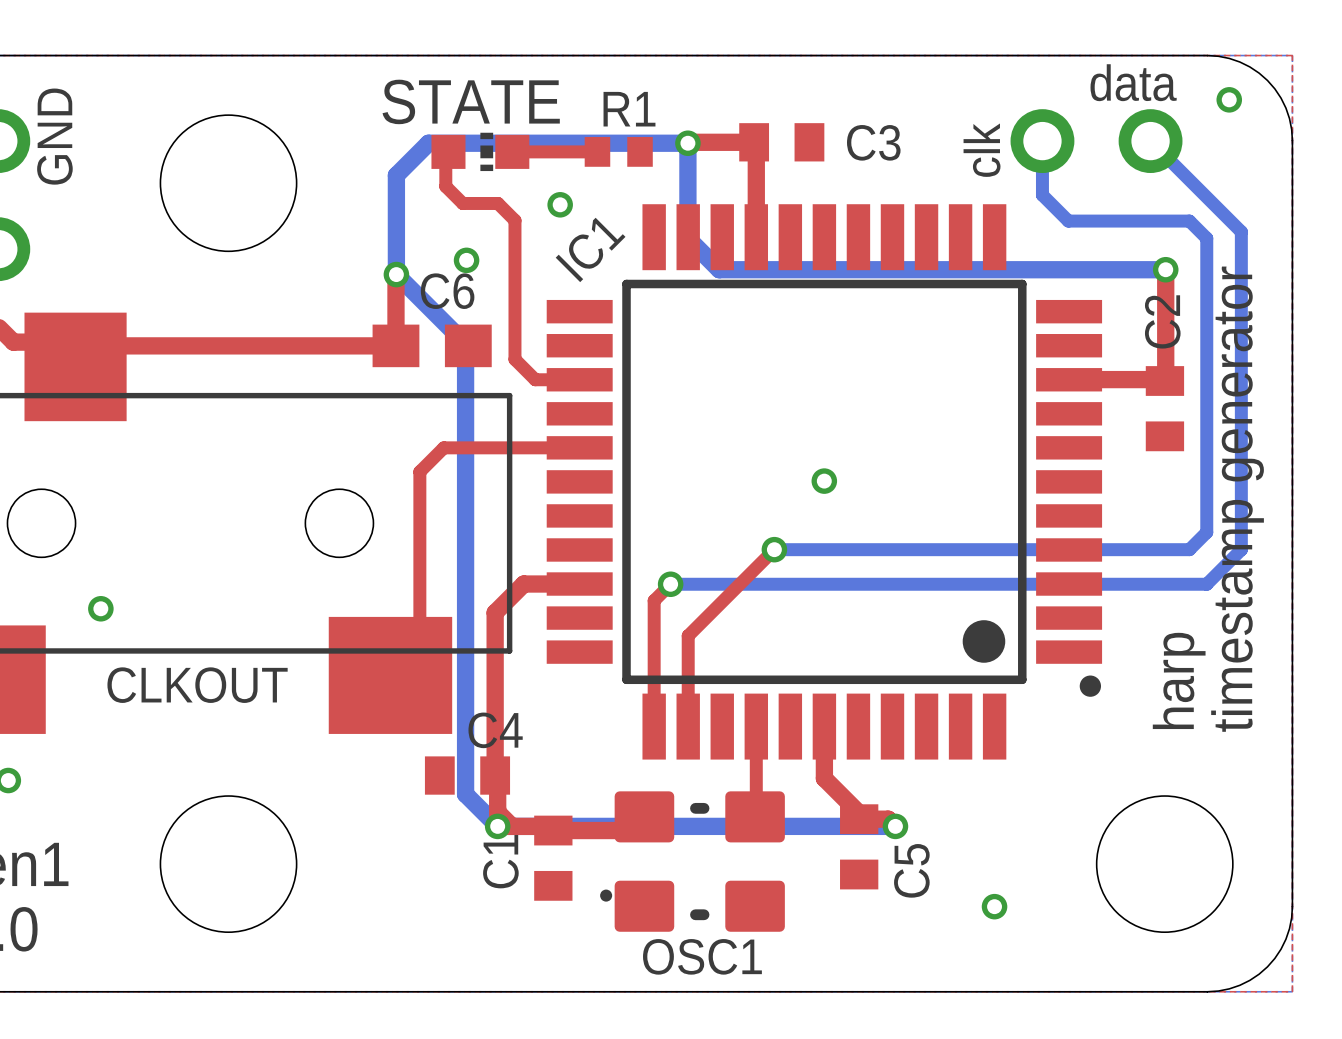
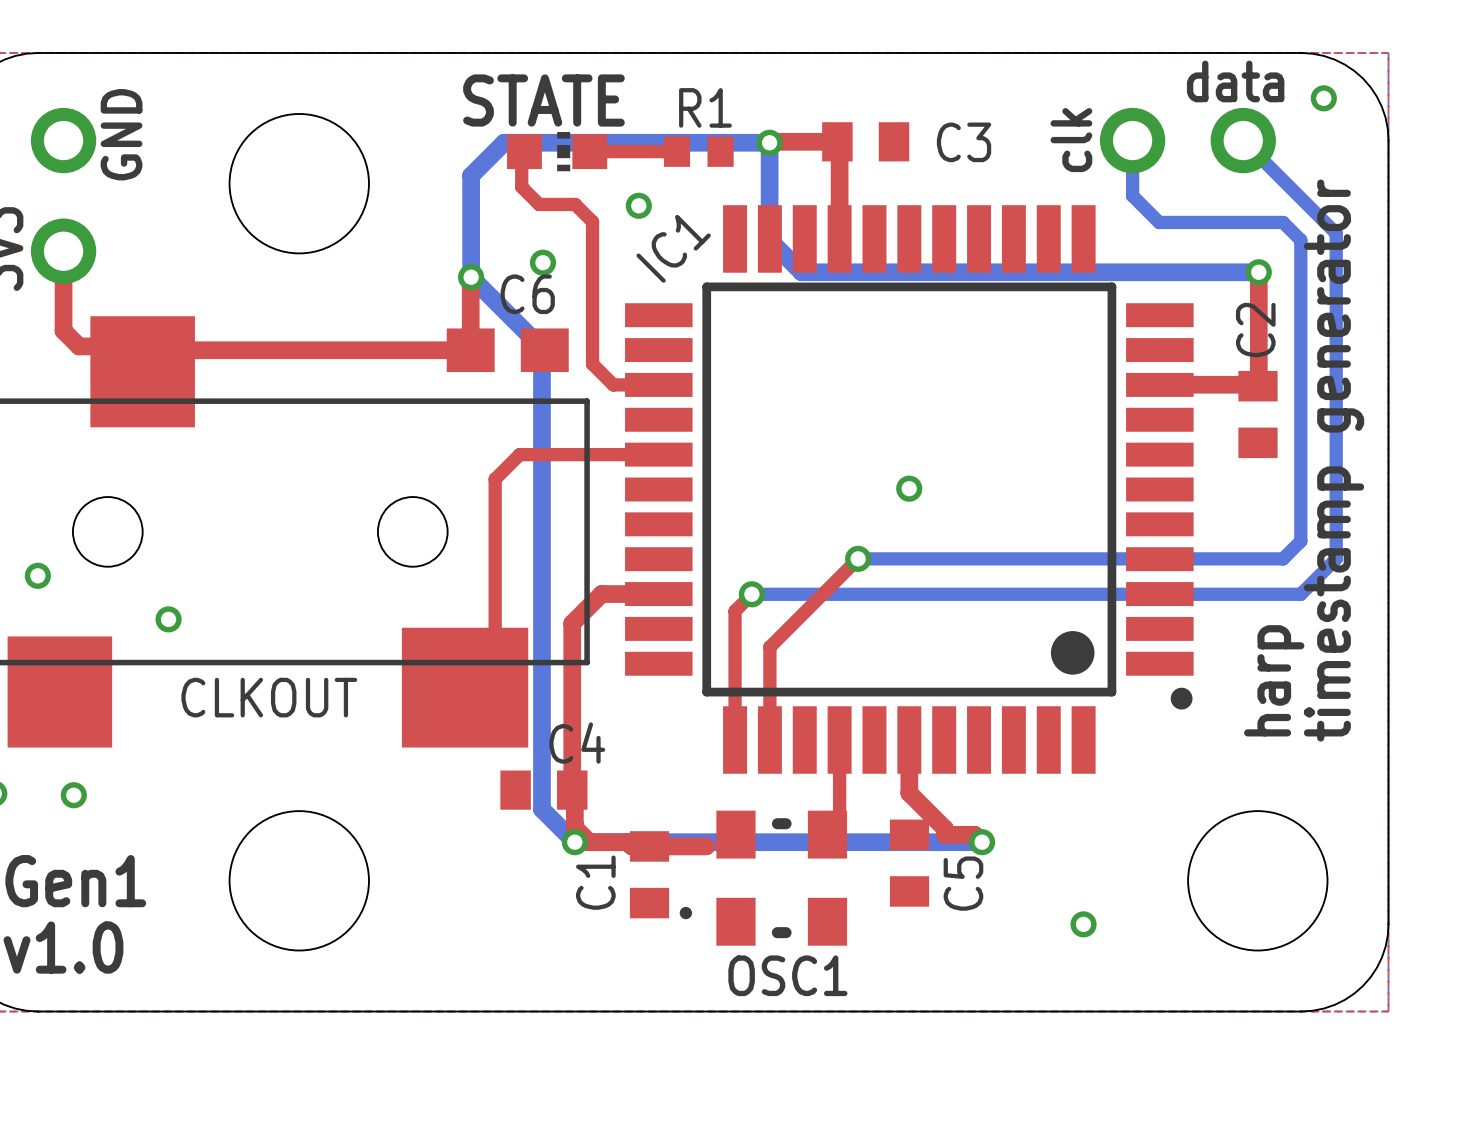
OSC1 footprint: [600, 791, 785, 932] -> [679, 810, 848, 946]
C5 position: (859, 846) -> (909, 863)
C1 position: (553, 858) -> (649, 874)

